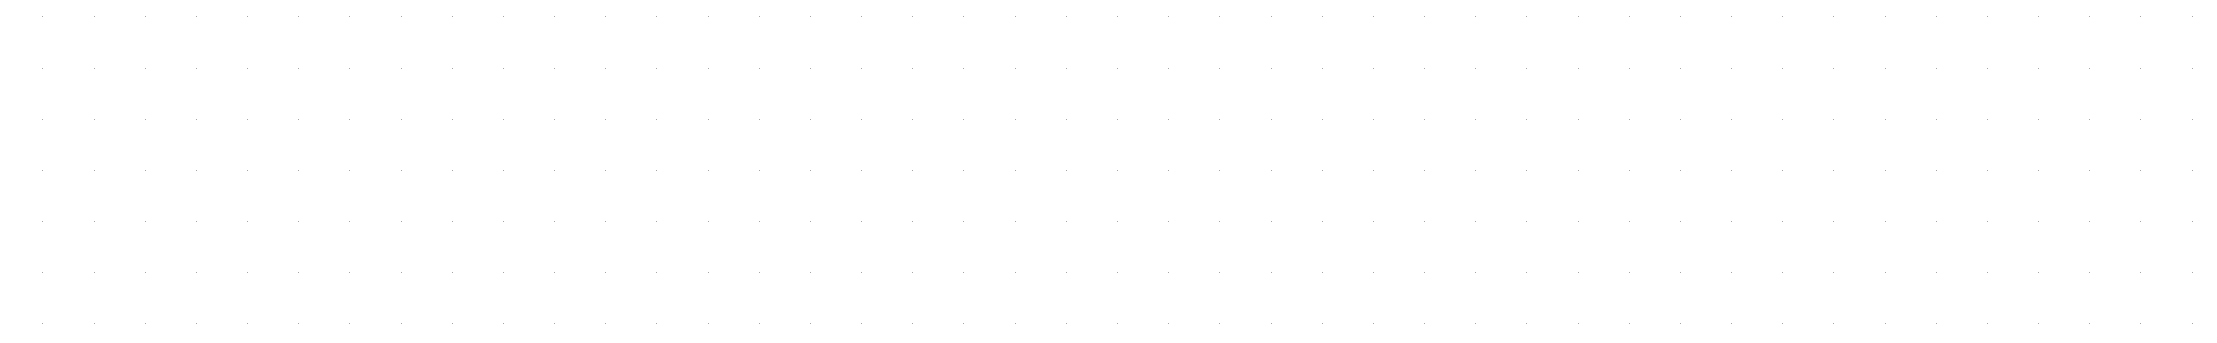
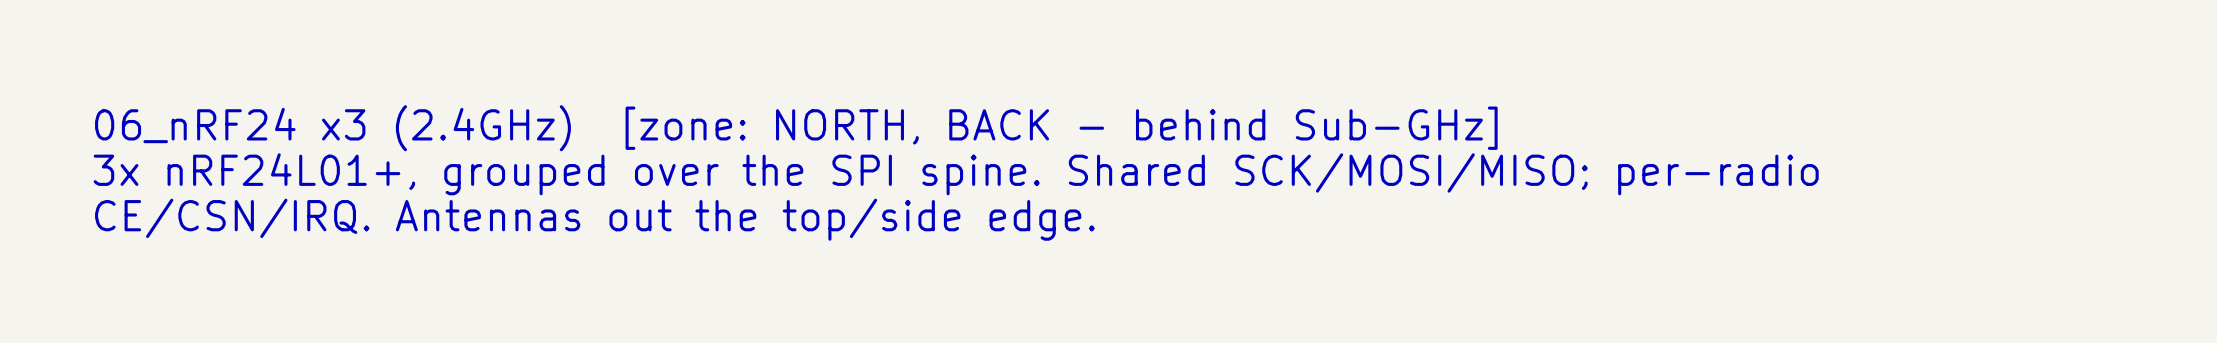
text: none -> 06_nRF24 x3 (2.4GHz) [zone: NORTH, BACK - behind Sub-GHz] (796, 128)
text: none -> 3x nRF24L01+, grouped over the SPI spine. Shared SCK/MOSI/MISO; per-radio (956, 174)
text: none -> CE/CSN/IRQ. Antennas out the top/side edge. (594, 219)

